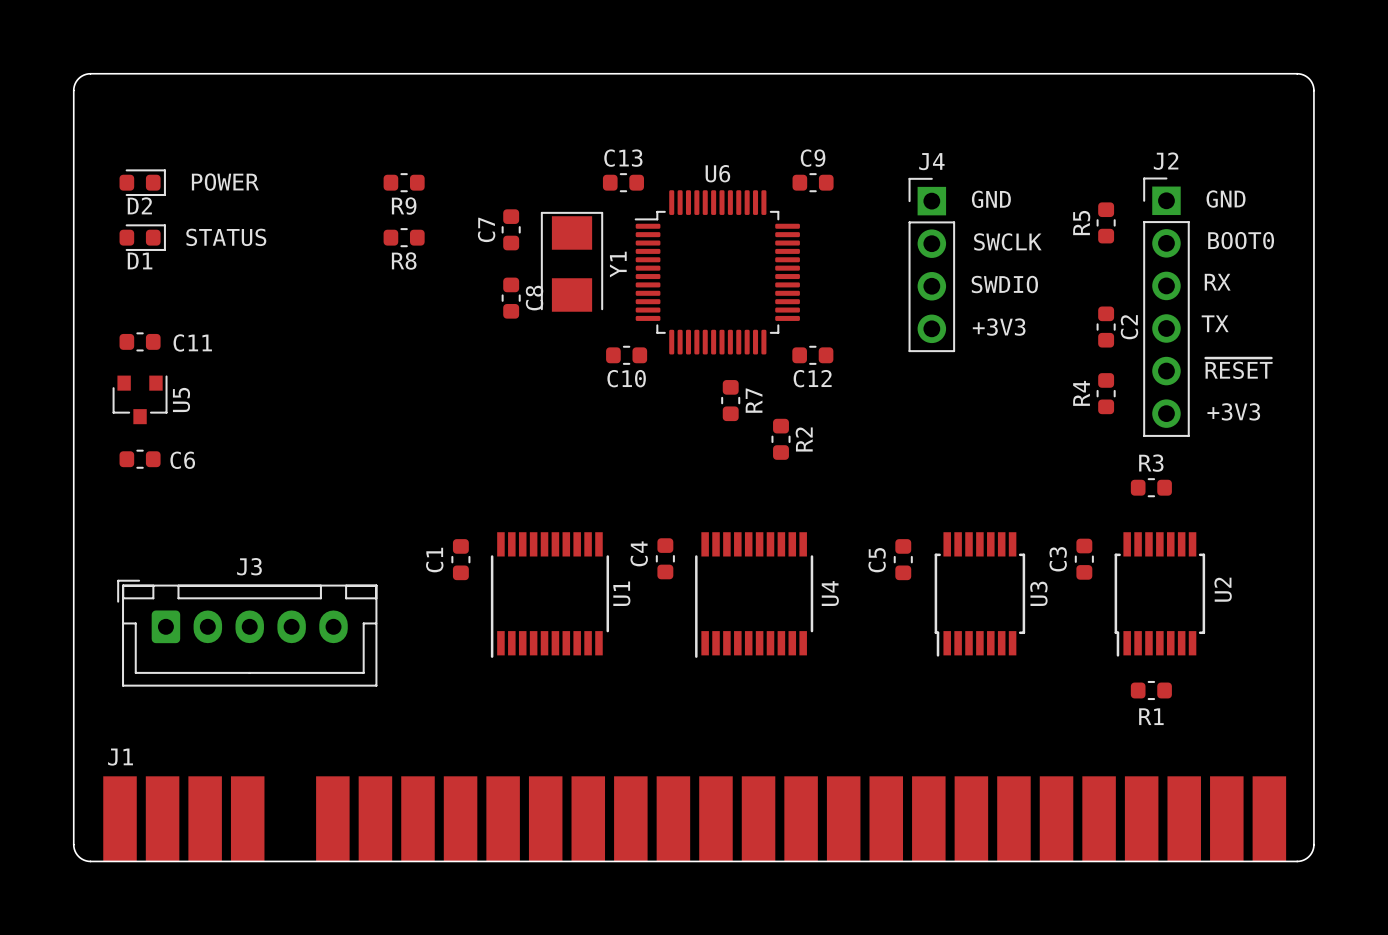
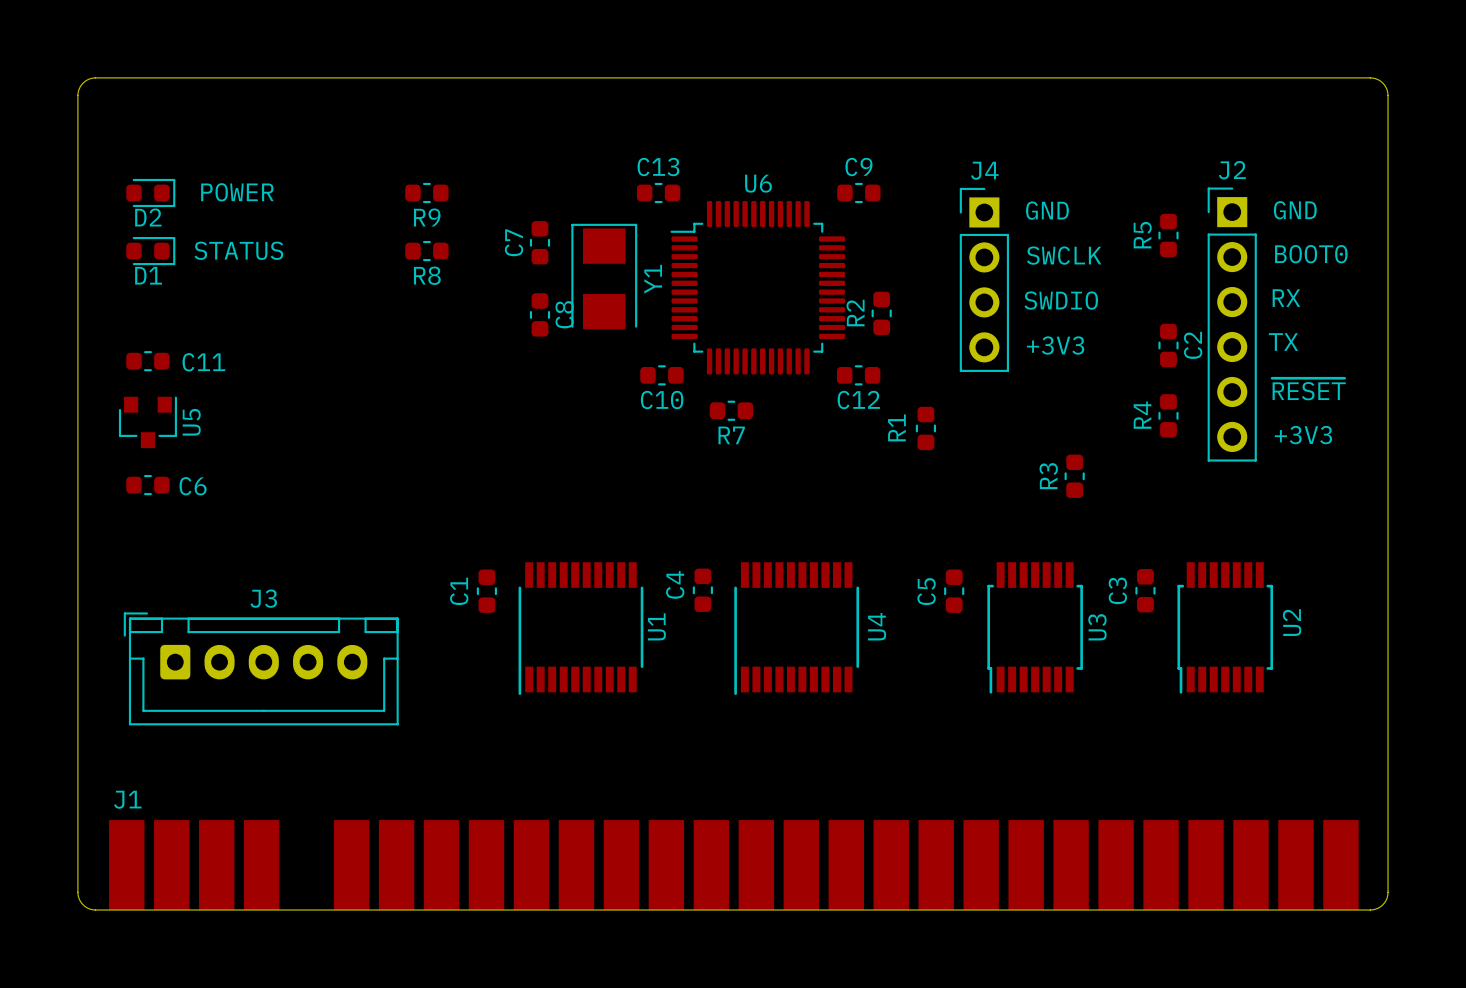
R7 rotation: 0° (730, 400) -> 90° clockwise (731, 410)
R7 position: (730, 400) -> (731, 410)
R2 position: (781, 439) -> (881, 313)
R2 name position: R2 (804, 439) -> R2 (855, 313)
R3 name position: R3 (1151, 463) -> R3 (1048, 476)
R3 rotation: 0° (1151, 487) -> 90° clockwise (1074, 476)
R3 position: (1151, 487) -> (1074, 476)
R1 rotation: 0° (1151, 690) -> 90° clockwise (925, 428)
R1 position: (1151, 690) -> (925, 428)

